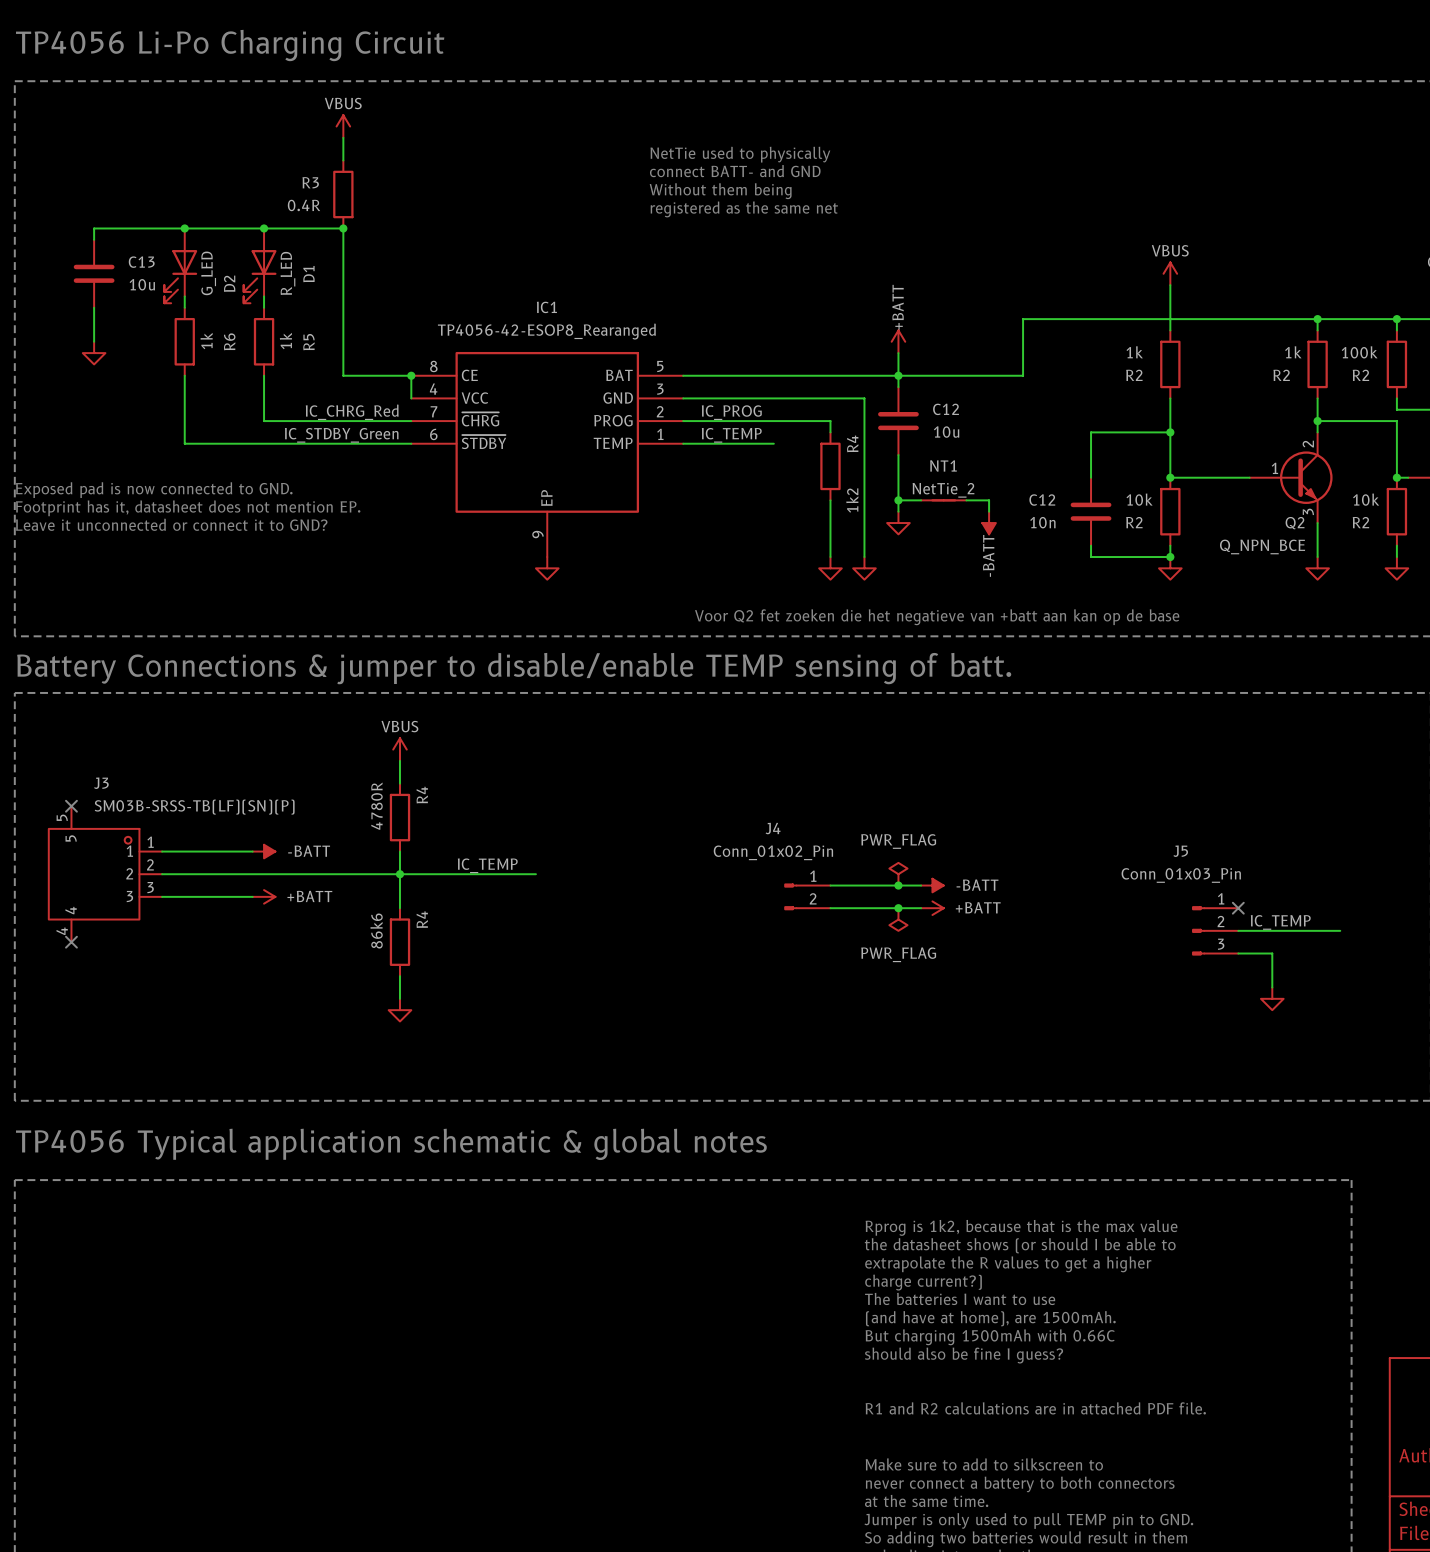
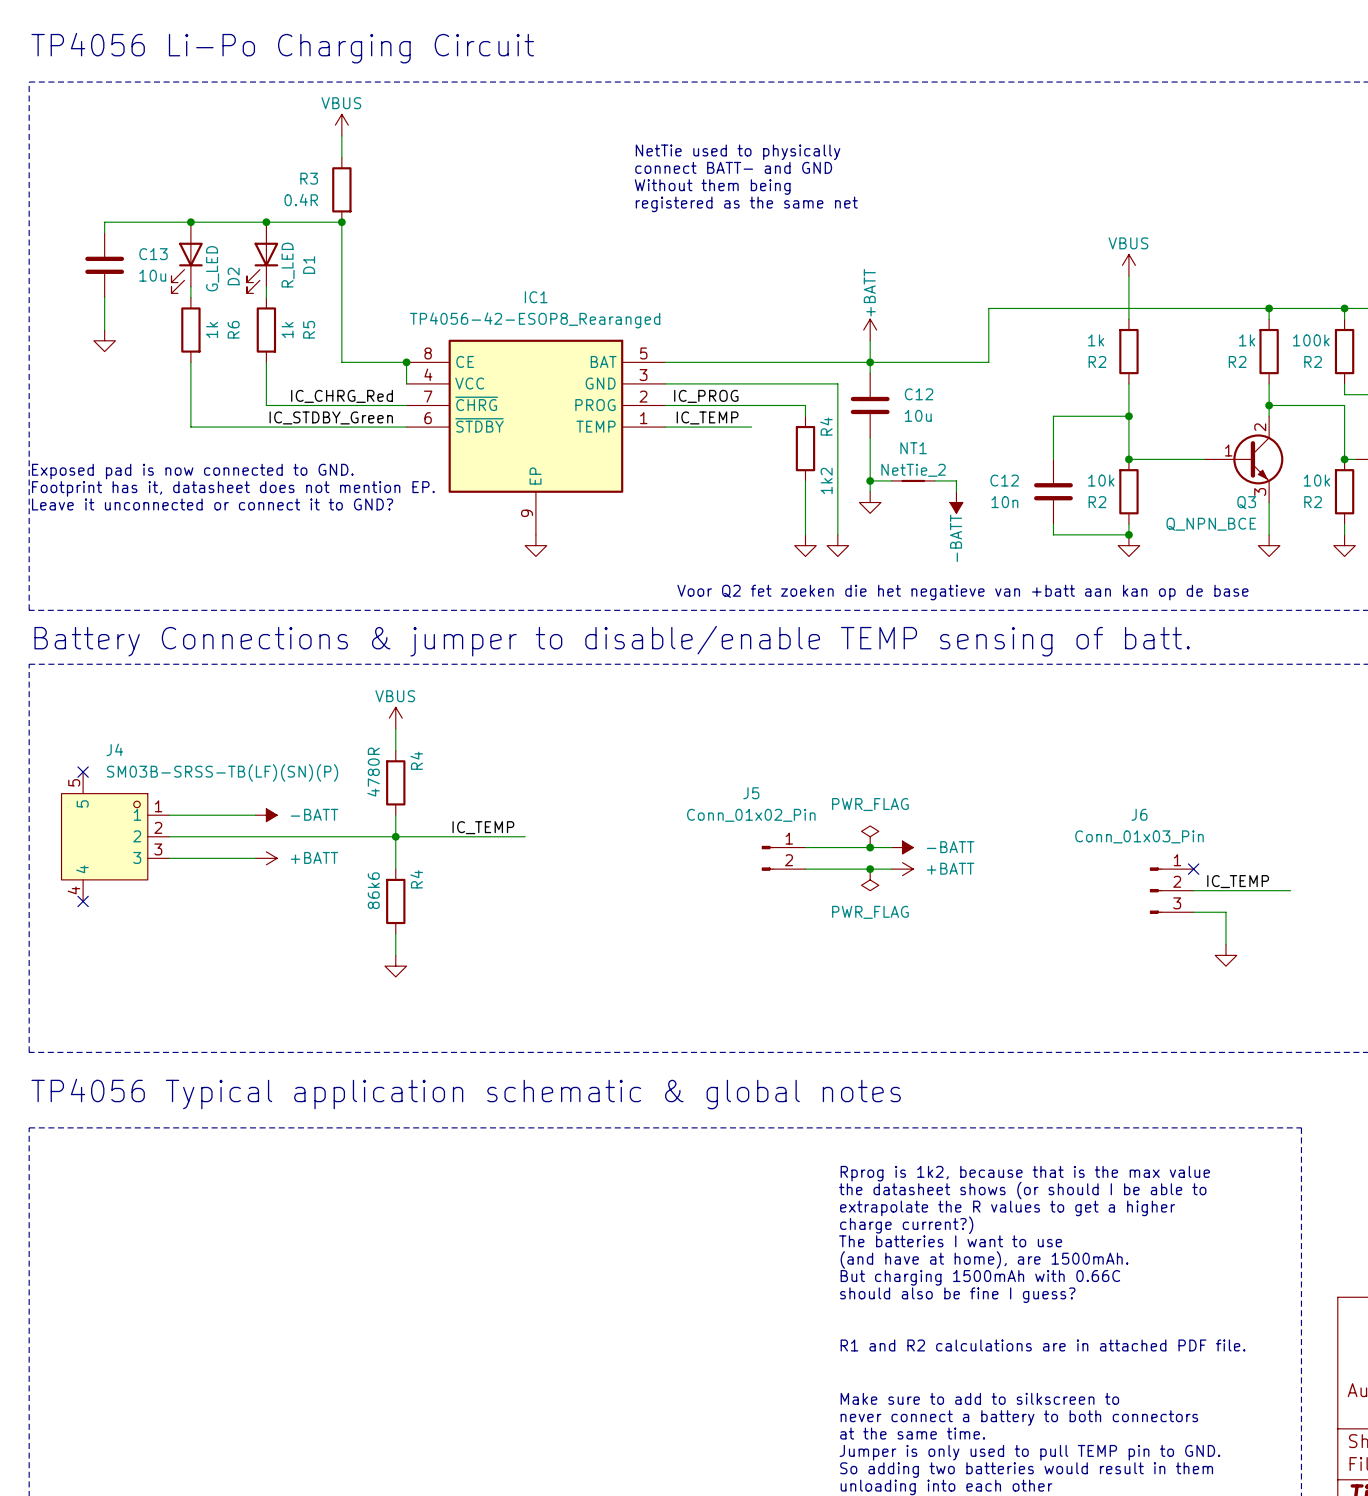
Q2 name: Q2 (1295, 523) -> Q3 (1246, 502)
J3 name: J3 (101, 783) -> J4 (114, 749)
J4 name: J4 (773, 828) -> J5 (751, 793)
J5 name: J5 (1180, 851) -> J6 (1139, 814)

